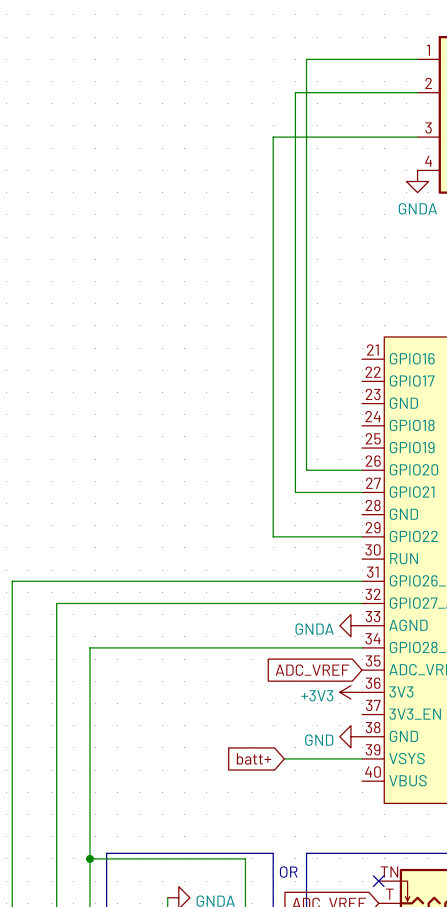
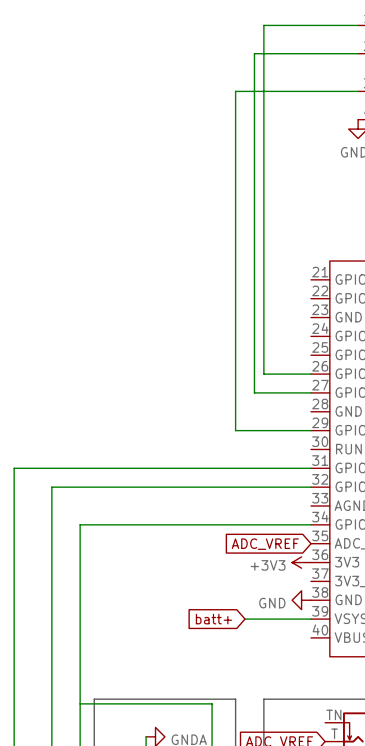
power symbol: GNDA (350, 625) -> none
junction: (89, 858) -> none
text: OR (288, 872) -> none
no-connect mark: (378, 881) -> none

